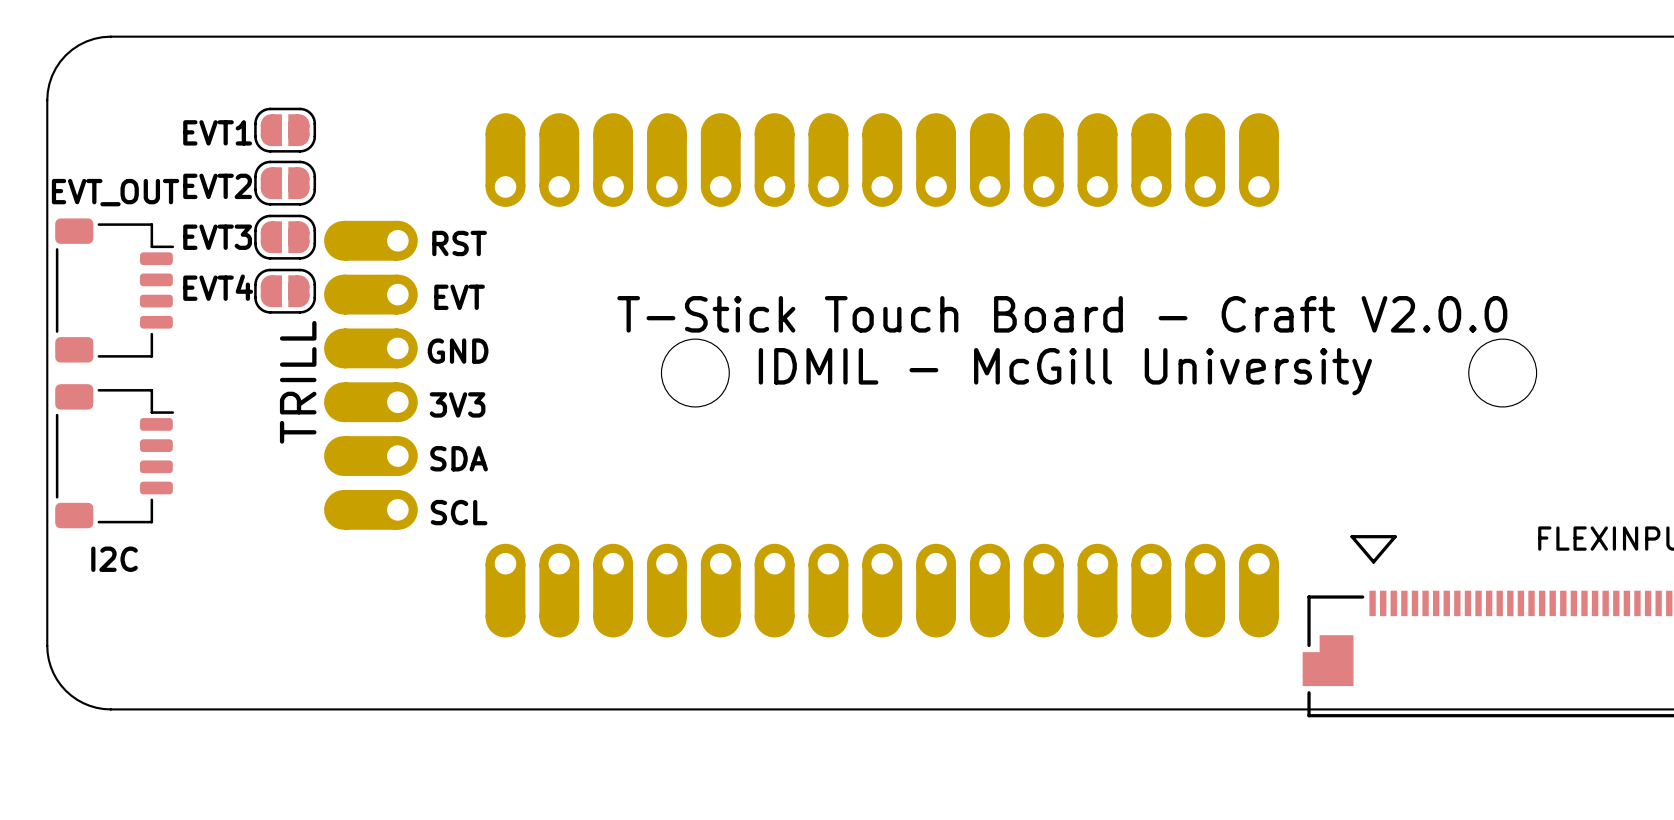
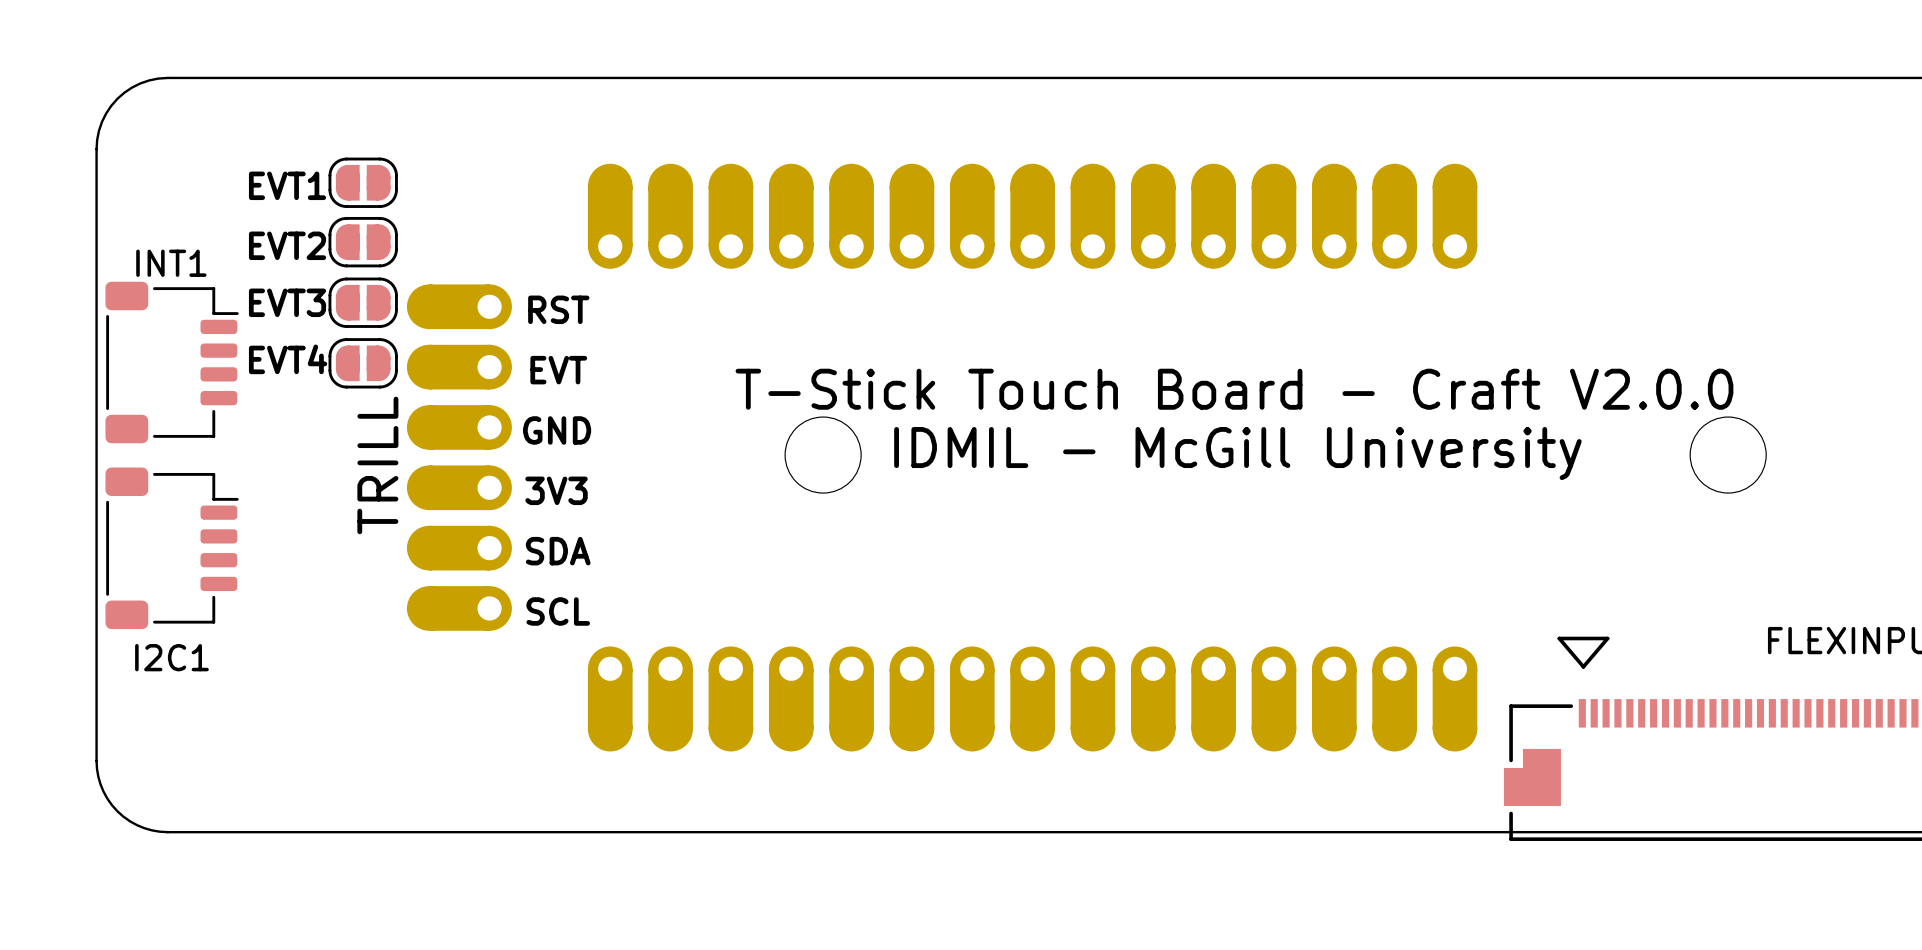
text: EVT_OUT (115, 192) -> none
INT1 name: none -> INT1 (171, 263)
I2C1 name: none -> I2C1 (171, 657)
text: I2C (114, 559) -> none

